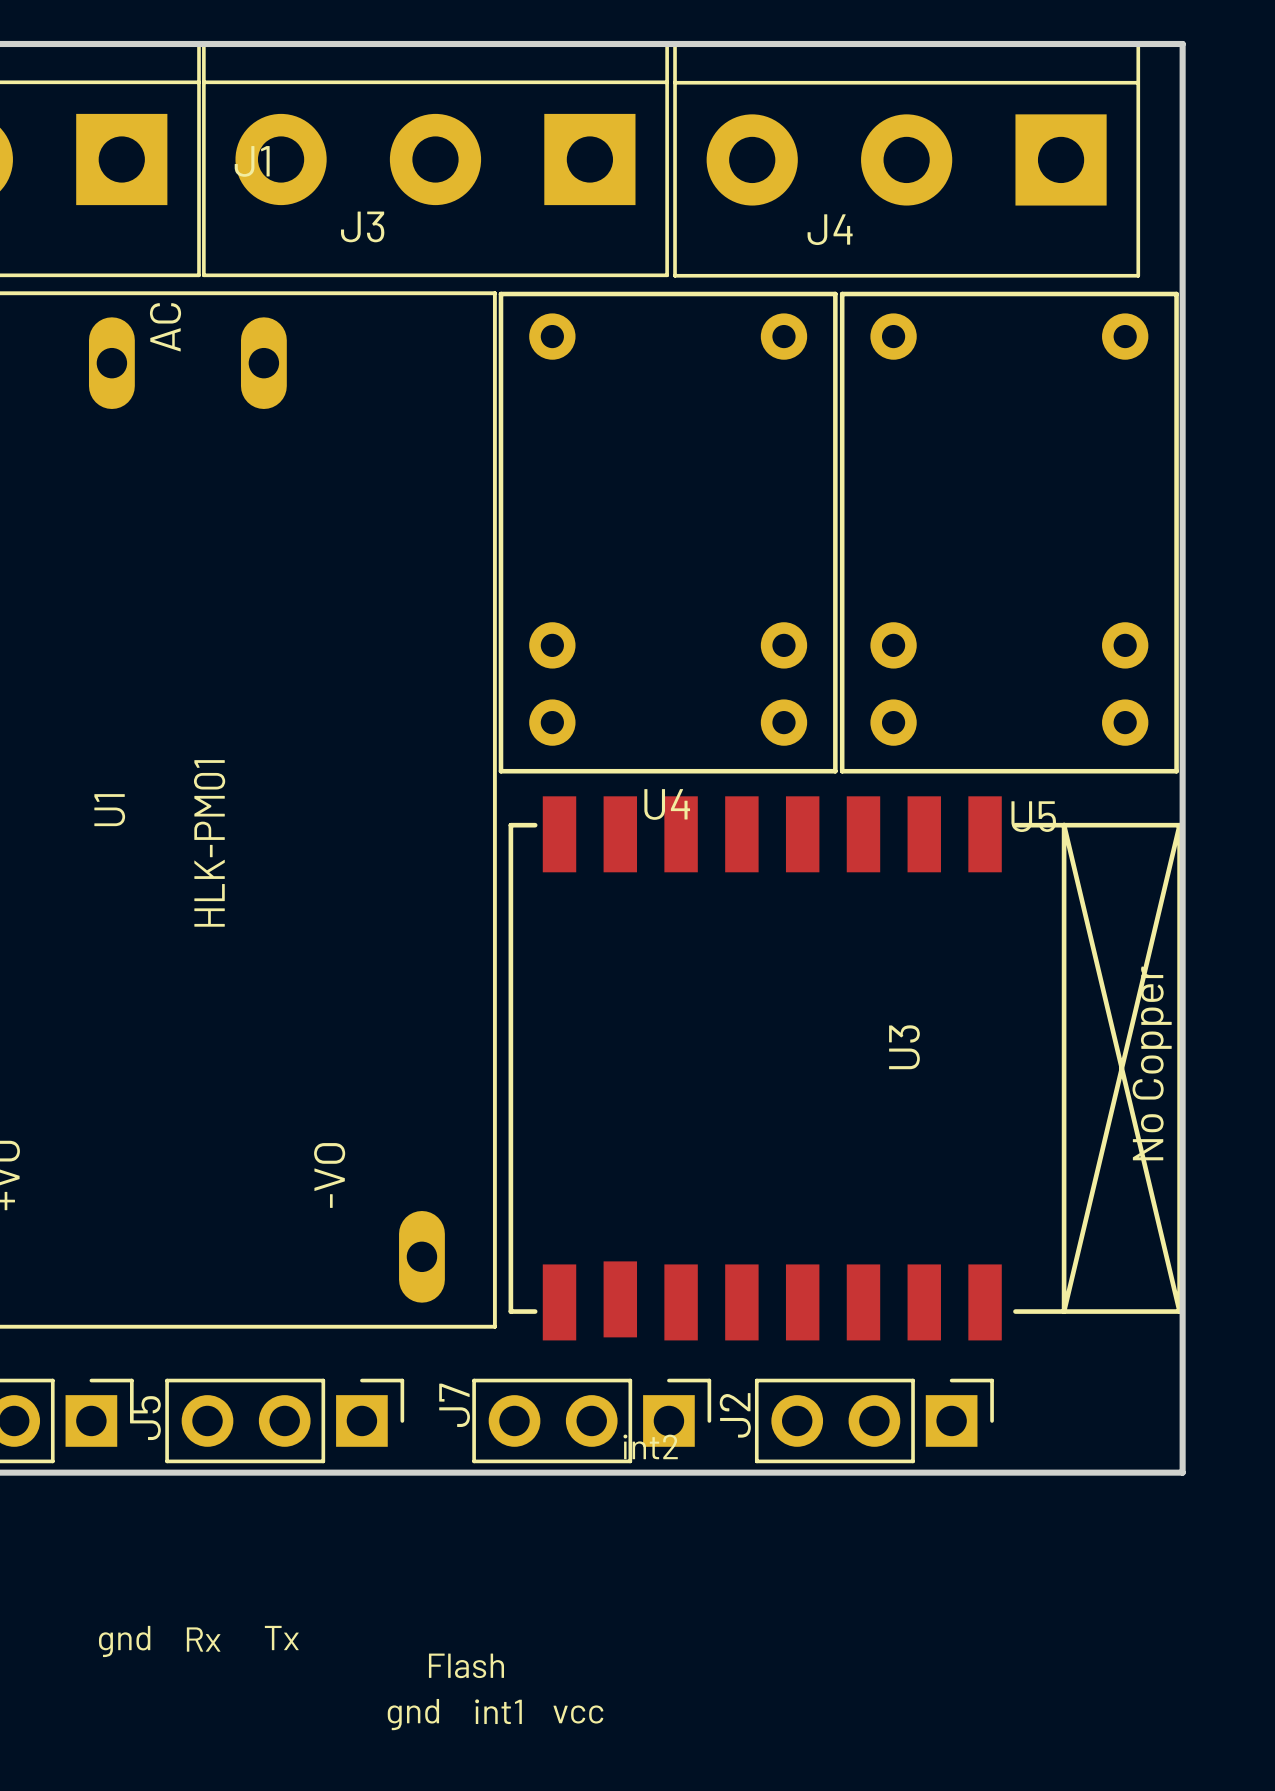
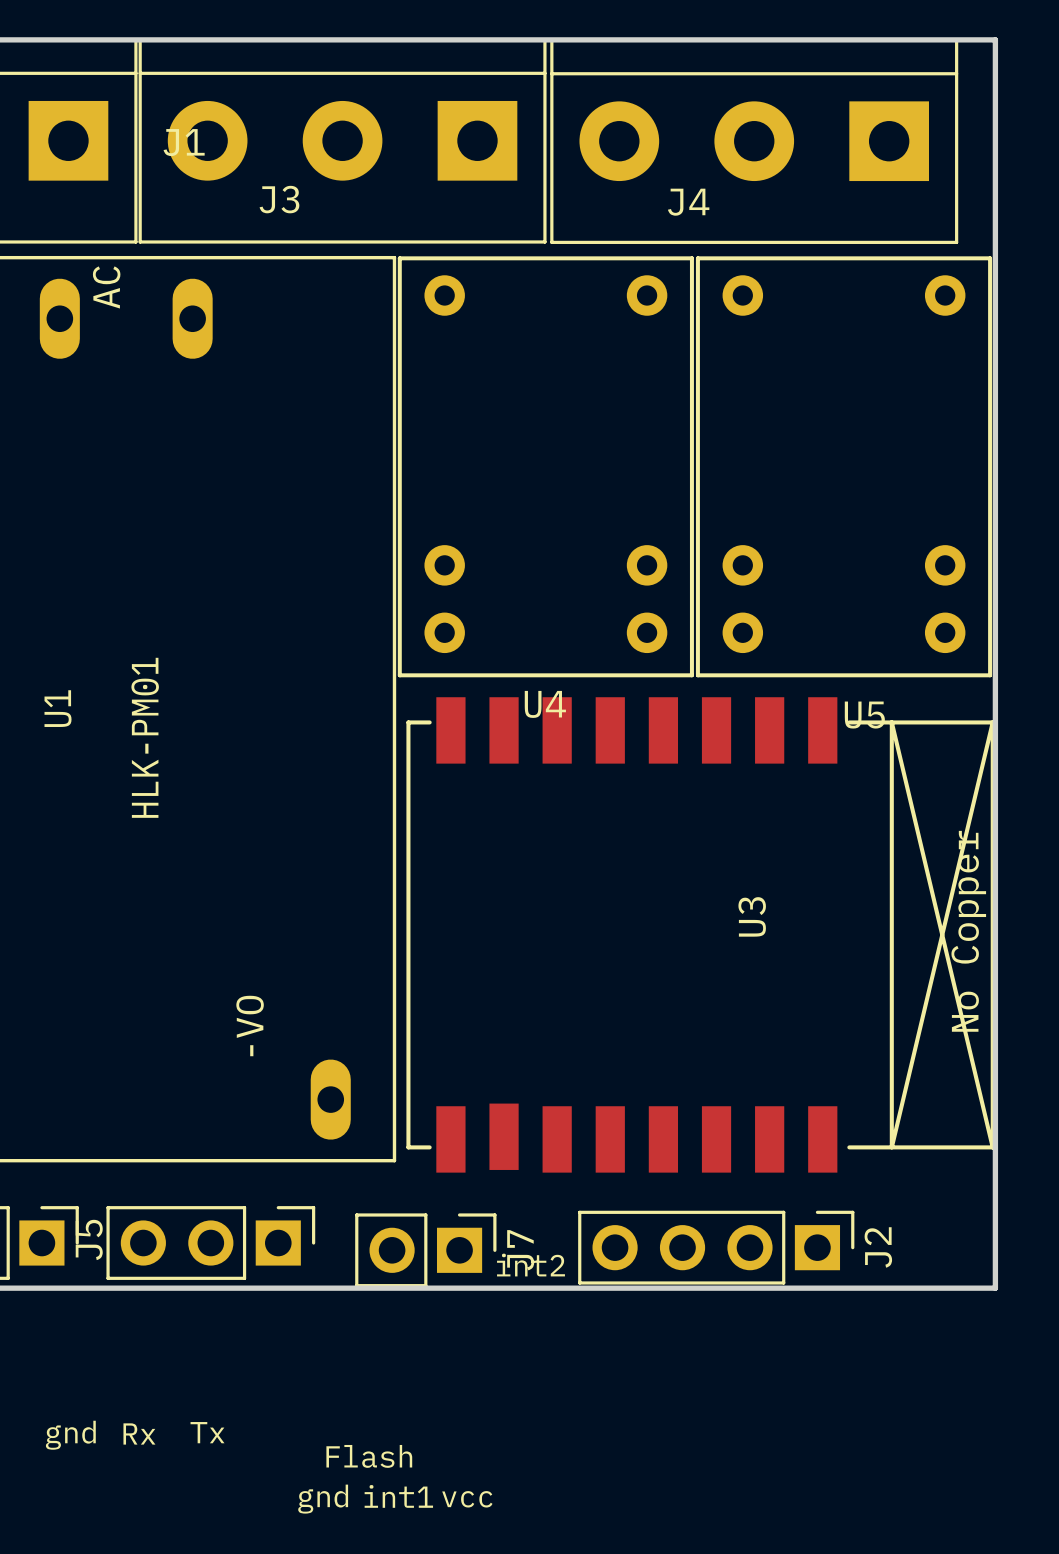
J7 footprint: [472, 1378, 712, 1464] -> [355, 1213, 497, 1288]
J2 footprint: [754, 1378, 994, 1464] -> [578, 1210, 855, 1285]
J7 name position: J7 (454, 1405) -> J7 (520, 1250)
J2 name position: J2 (735, 1415) -> J2 (878, 1247)

